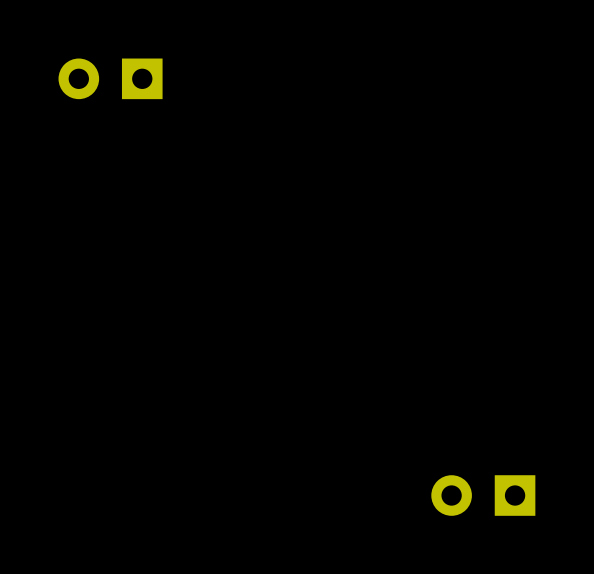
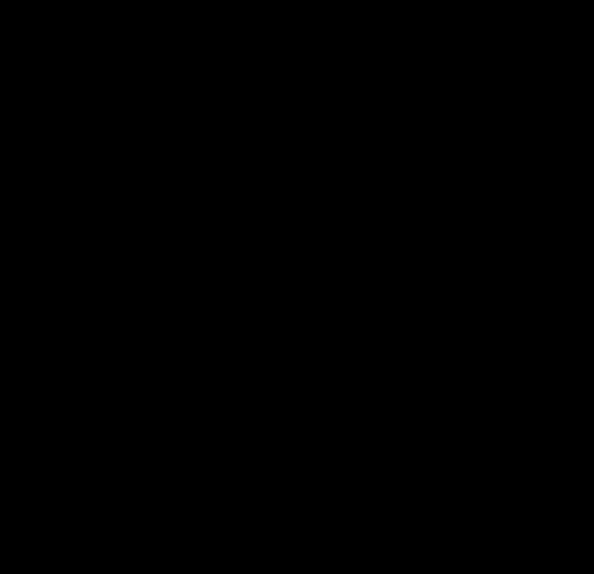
part: (110, 78) -> none
part: (483, 495) -> none

